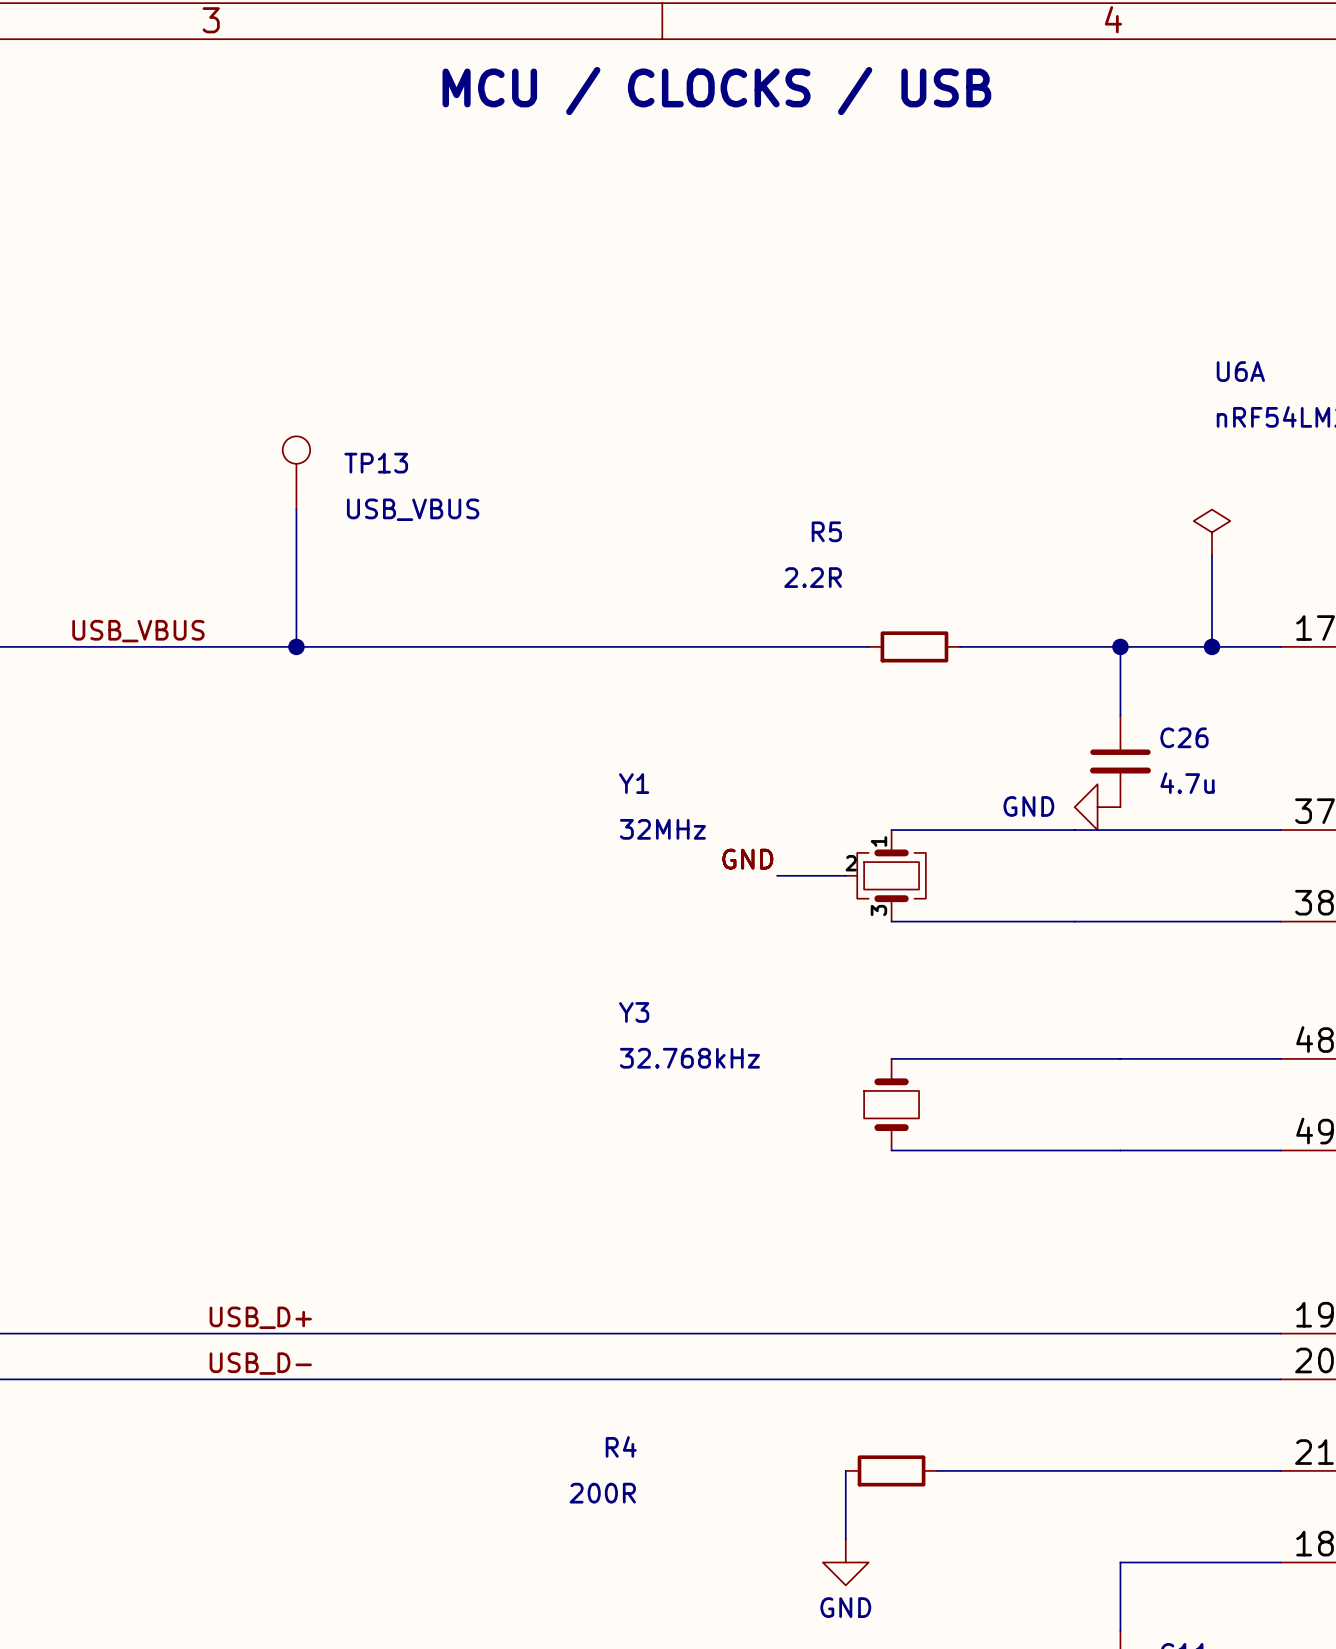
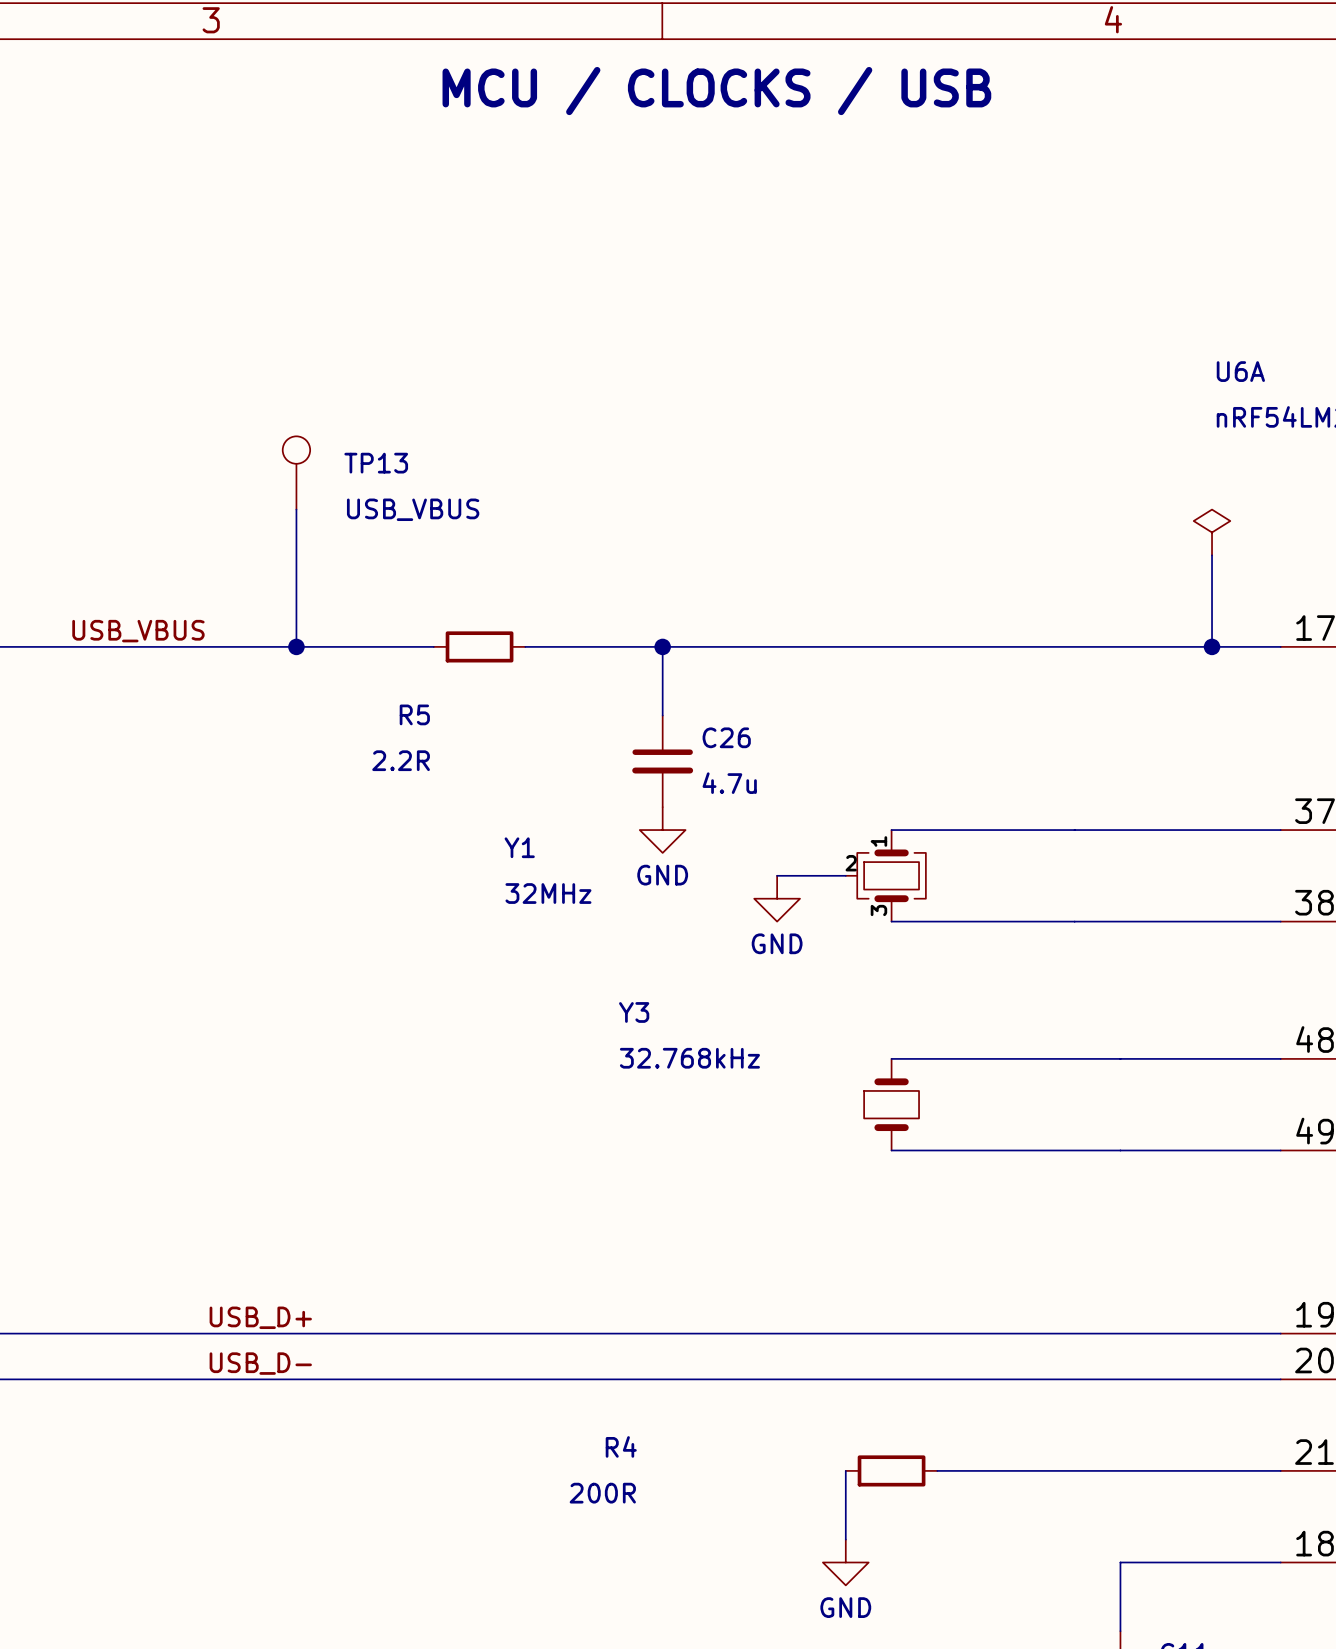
R5 name position: R5 (826, 531) -> R5 (414, 714)
R5 value position: 2.2R (813, 577) -> 2.2R (401, 760)
wire: (433, 646) (525, 646) -> (868, 646) (960, 646)
wire: none -> (662, 646) (662, 715)
junction: none -> (662, 646)
R5 position: (914, 646) -> (479, 646)
wire: (1120, 646) (1120, 715) -> none
junction: (1120, 646) -> none
C26 position: (1120, 761) -> (662, 761)
Y1 name position: Y1 (634, 783) -> Y1 (519, 847)
power symbol: GND (1097, 807) -> none
Y1 value position: 32MHz (662, 829) -> 32MHz (548, 893)
power symbol: none -> GND (662, 830)
label: GND (747, 859) -> none
power symbol: none -> GND (777, 898)

